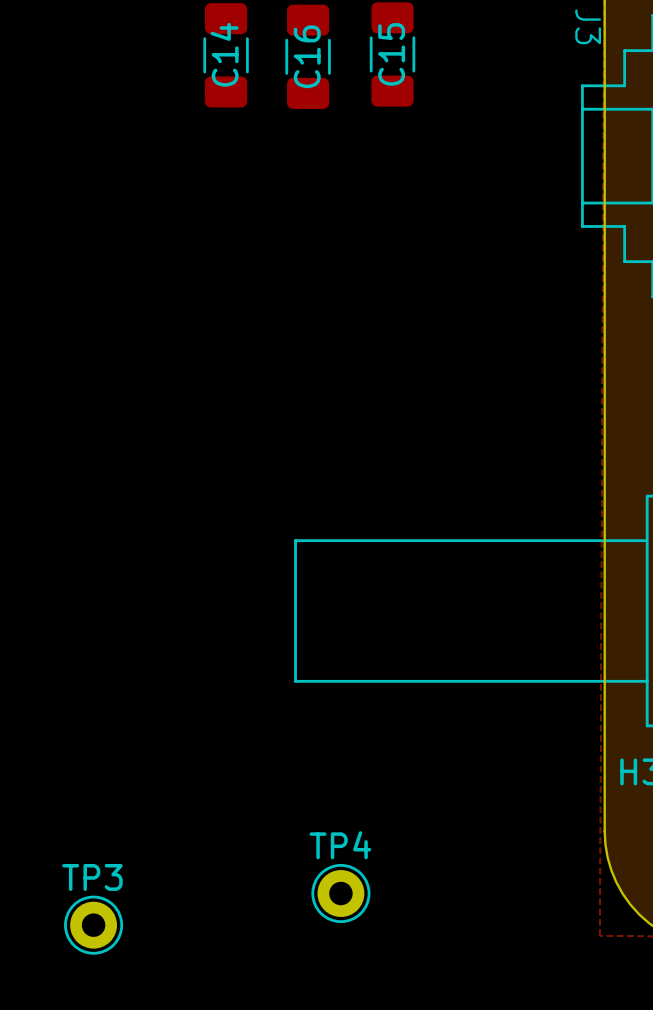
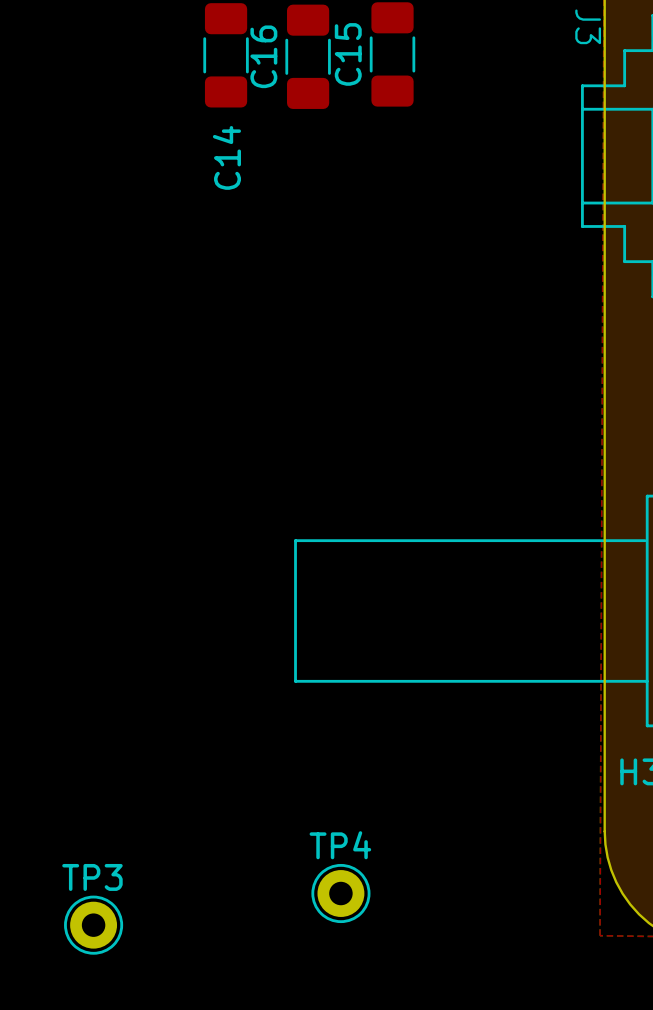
C14 name position: C14 (224, 54) -> C14 (226, 157)
C15 name position: C15 (391, 54) -> C15 (348, 54)
C16 name position: C16 (307, 56) -> C16 (263, 56)

